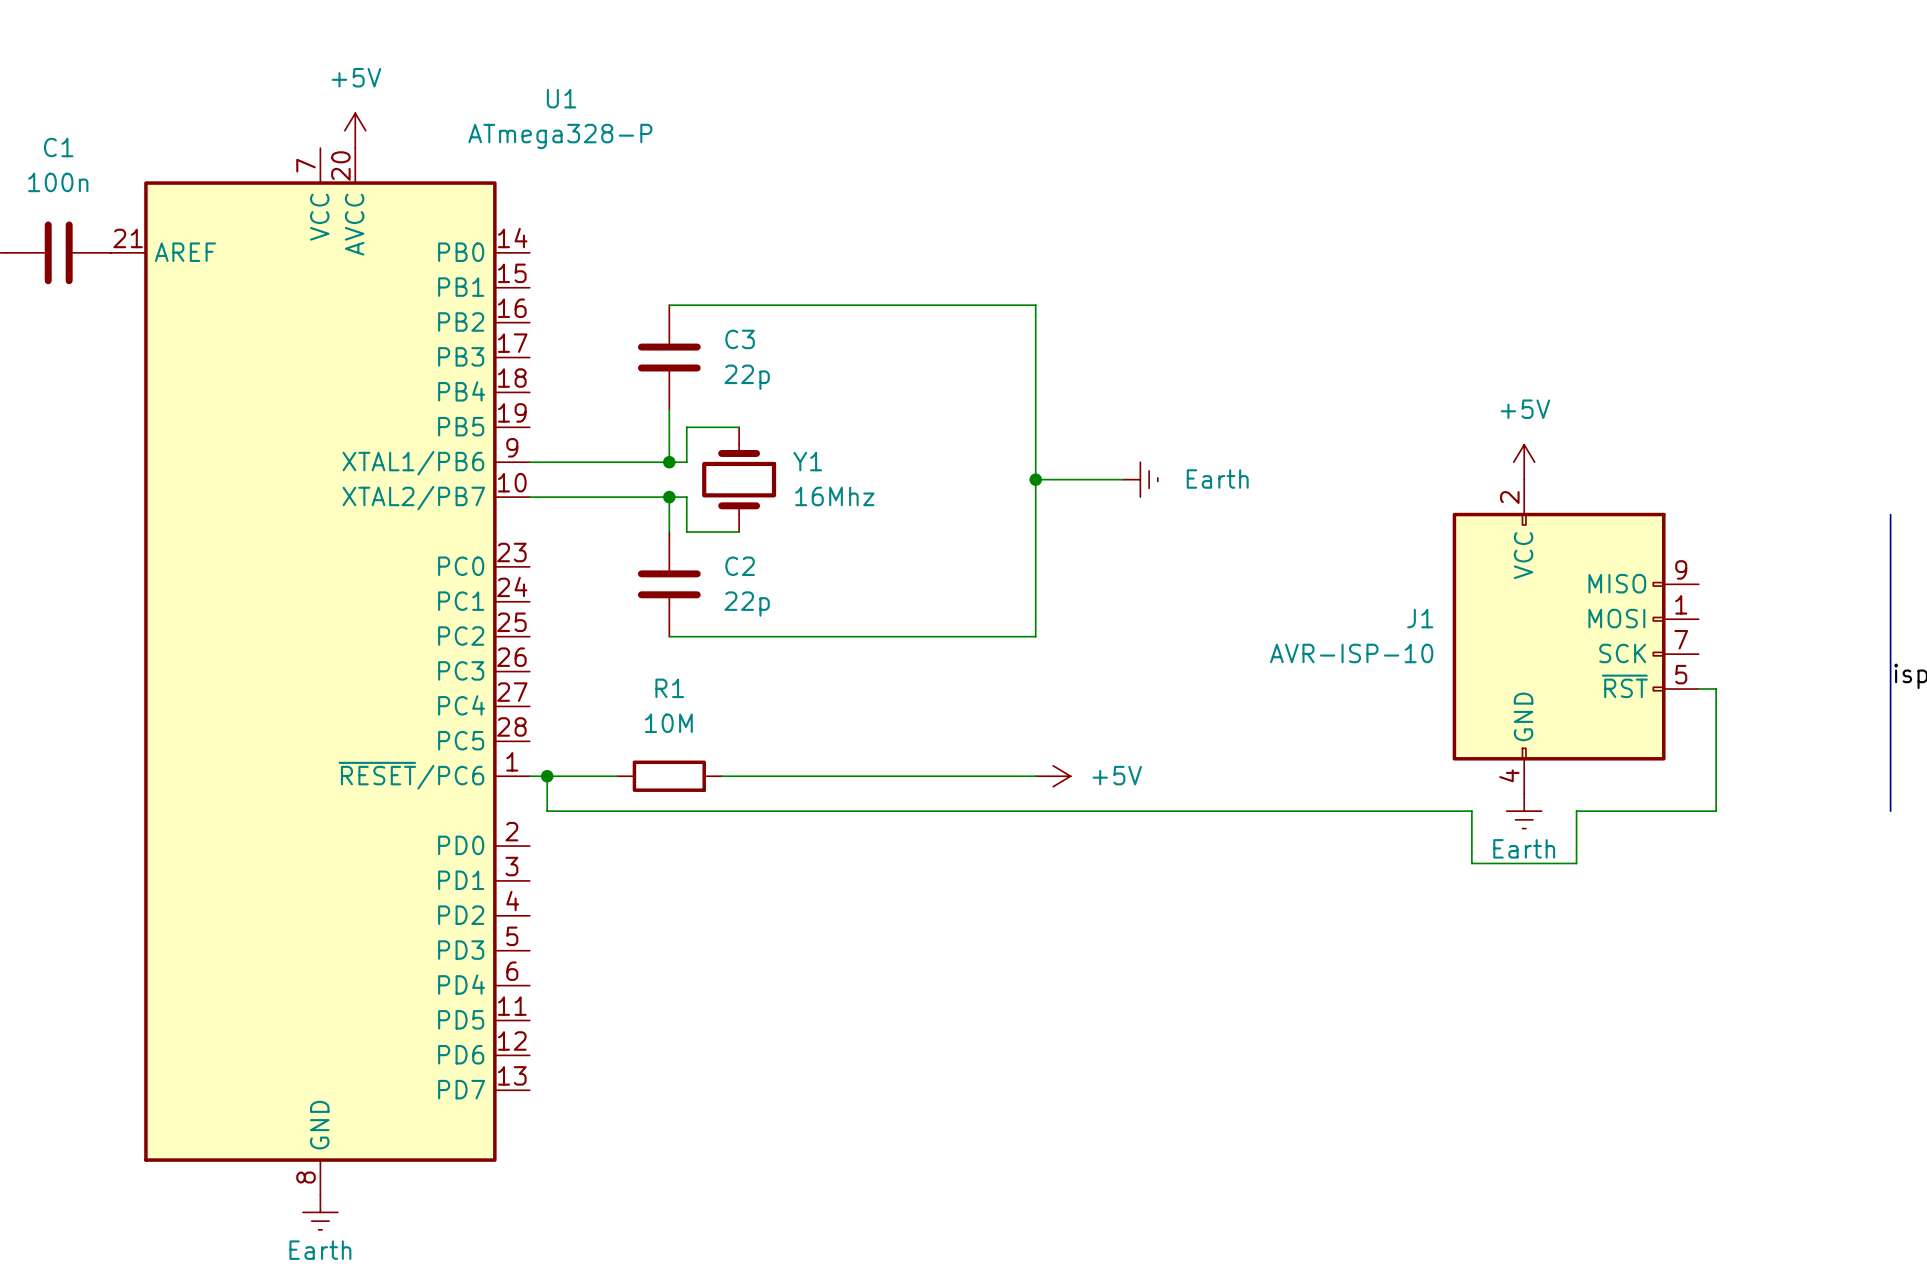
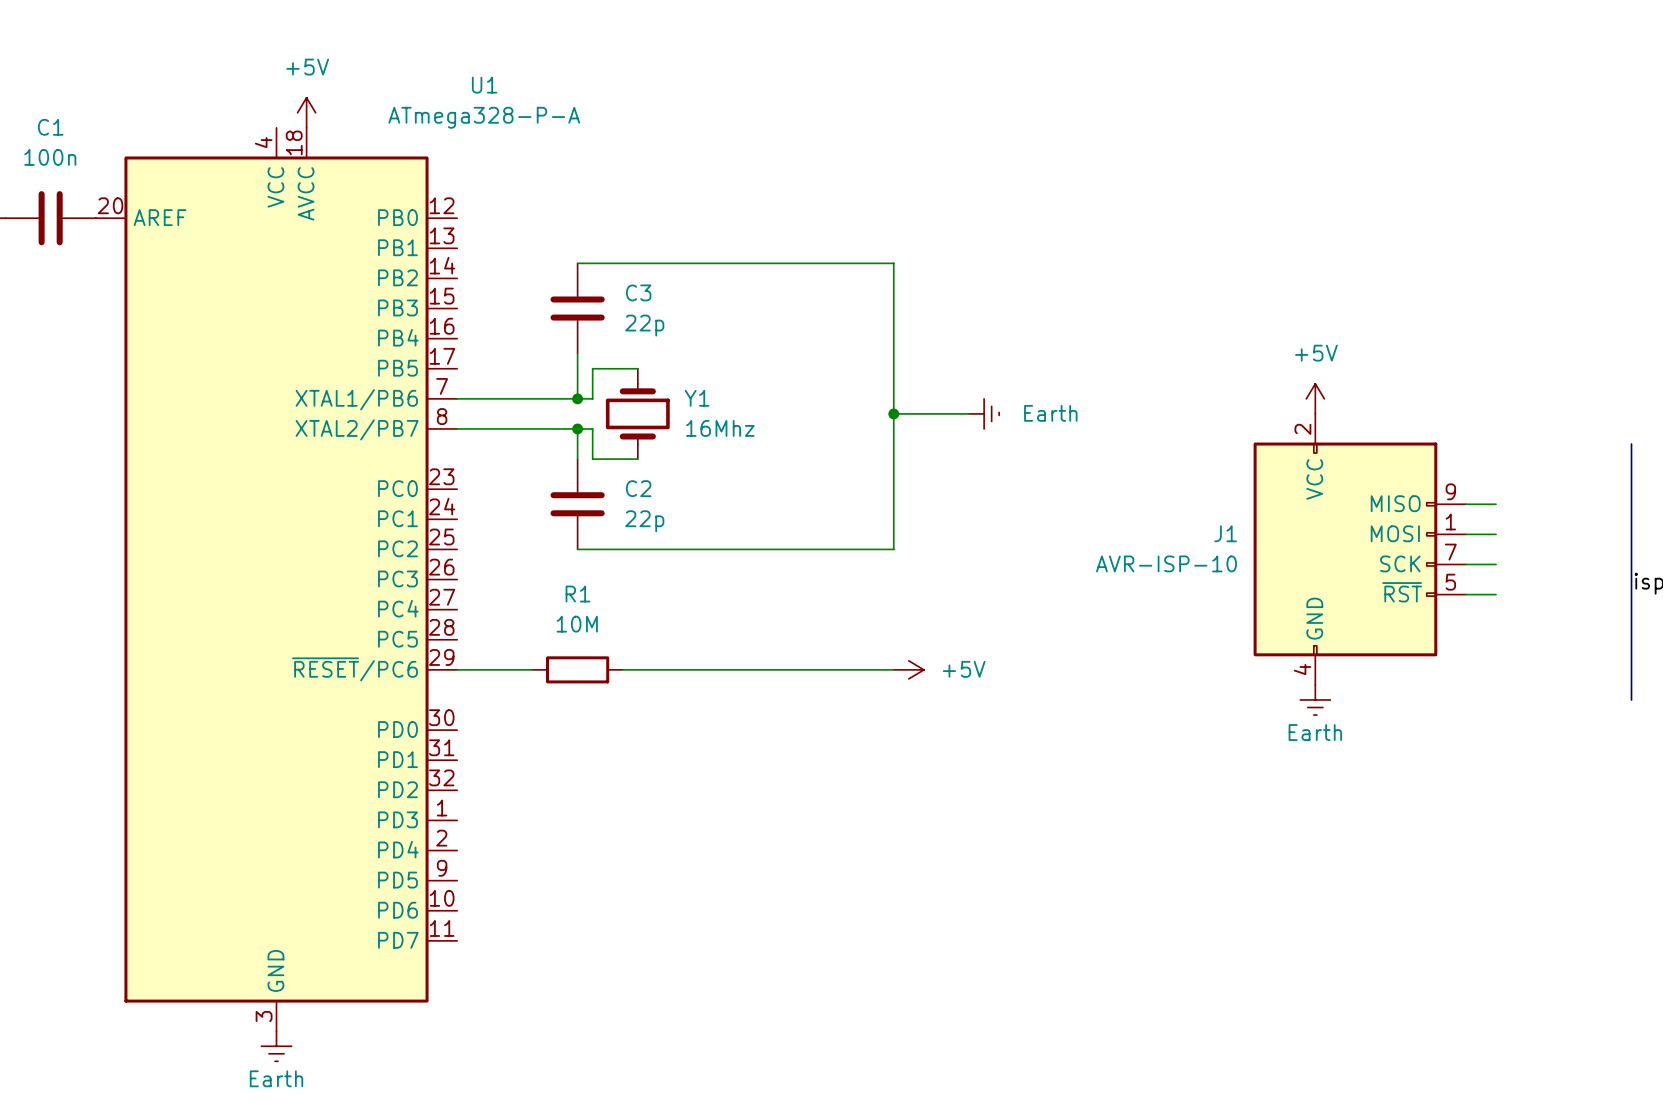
U1 value: ATmega328-P (560, 136) -> ATmega328-P-A (484, 117)
U1 symbol: [111, 148, 530, 1195] -> [95, 127, 458, 1032]
wire: none -> (1465, 504) (1496, 504)
wire: none -> (1465, 534) (1496, 534)
wire: none -> (1465, 564) (1496, 564)
wire: (1716, 689) (1716, 811) (1576, 811) (1576, 863) (1471, 863) (1471, 811) (547, 811) (547, 776) -> (1480, 594) (1496, 594)
junction: (547, 776) -> none

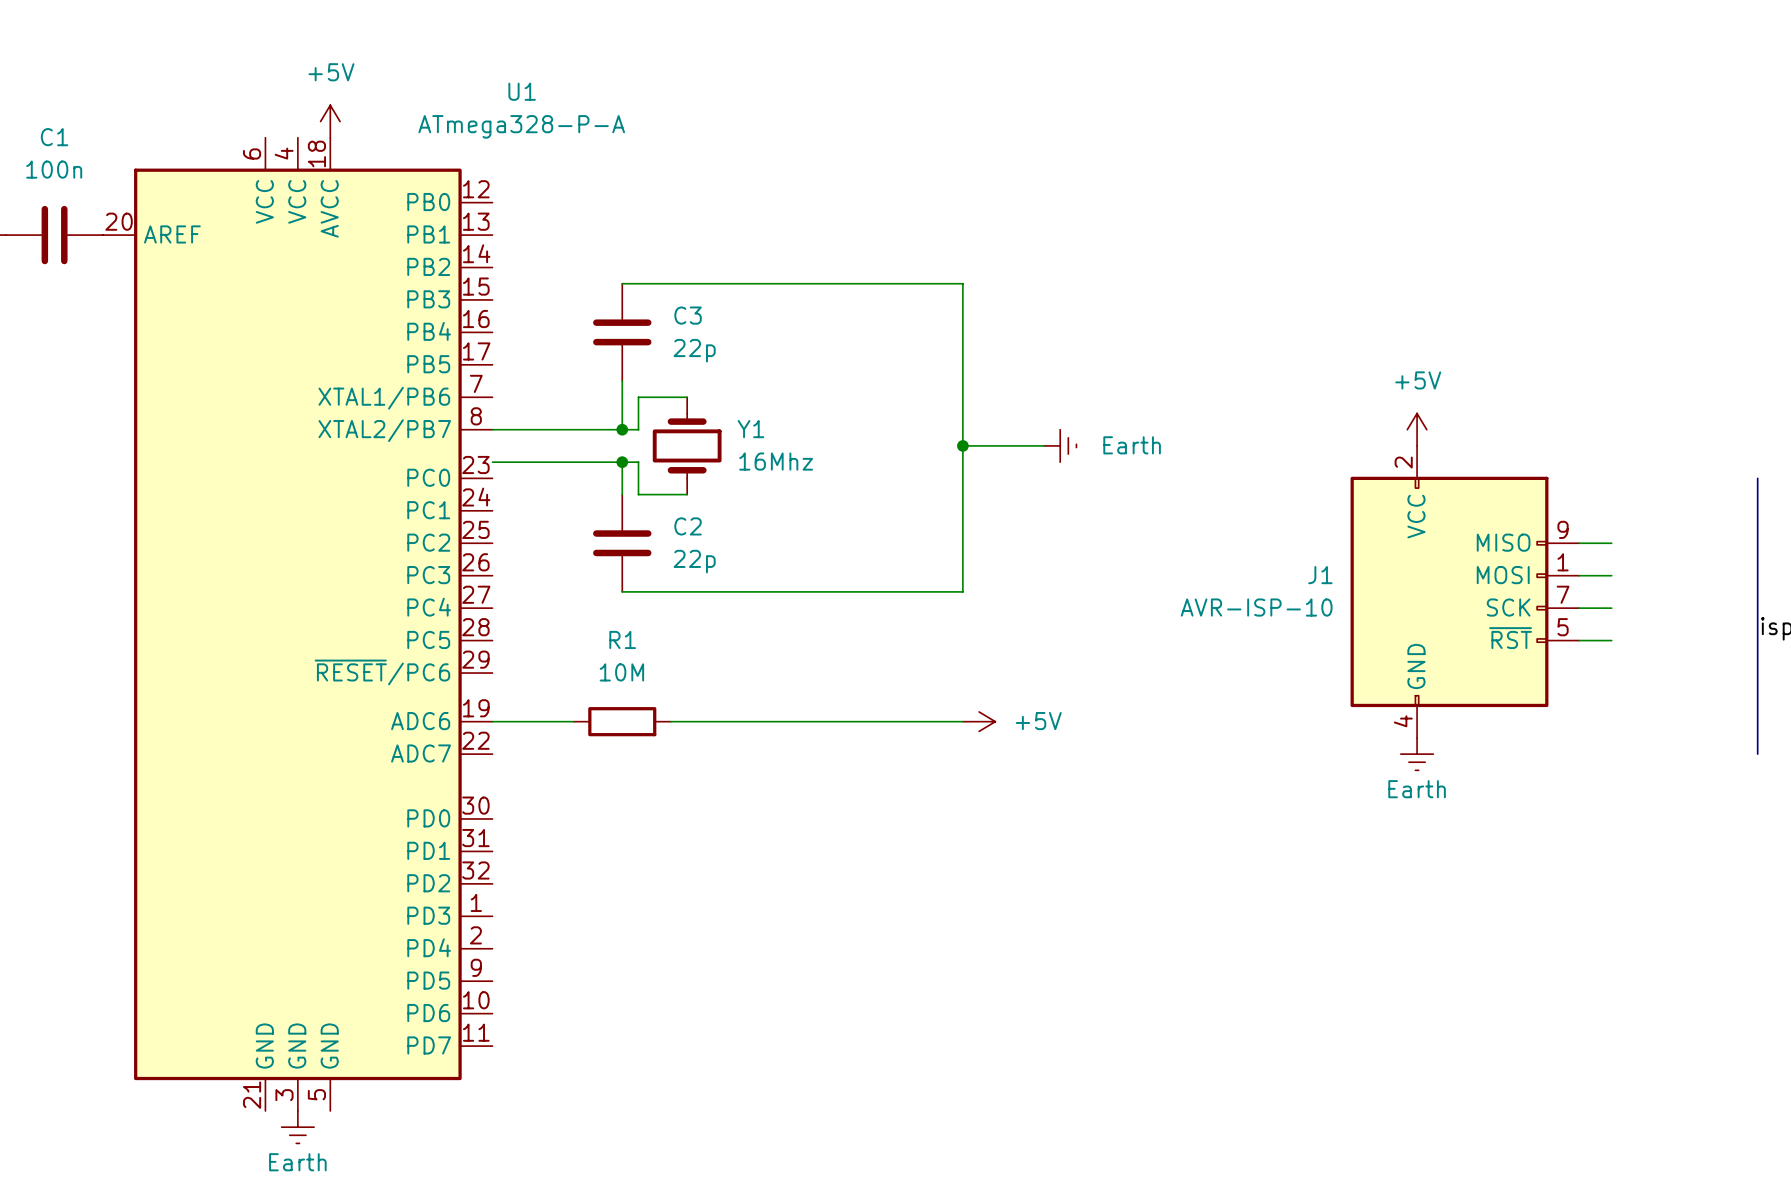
U1 symbol: [95, 127, 458, 1032] -> [103, 137, 493, 1111]

